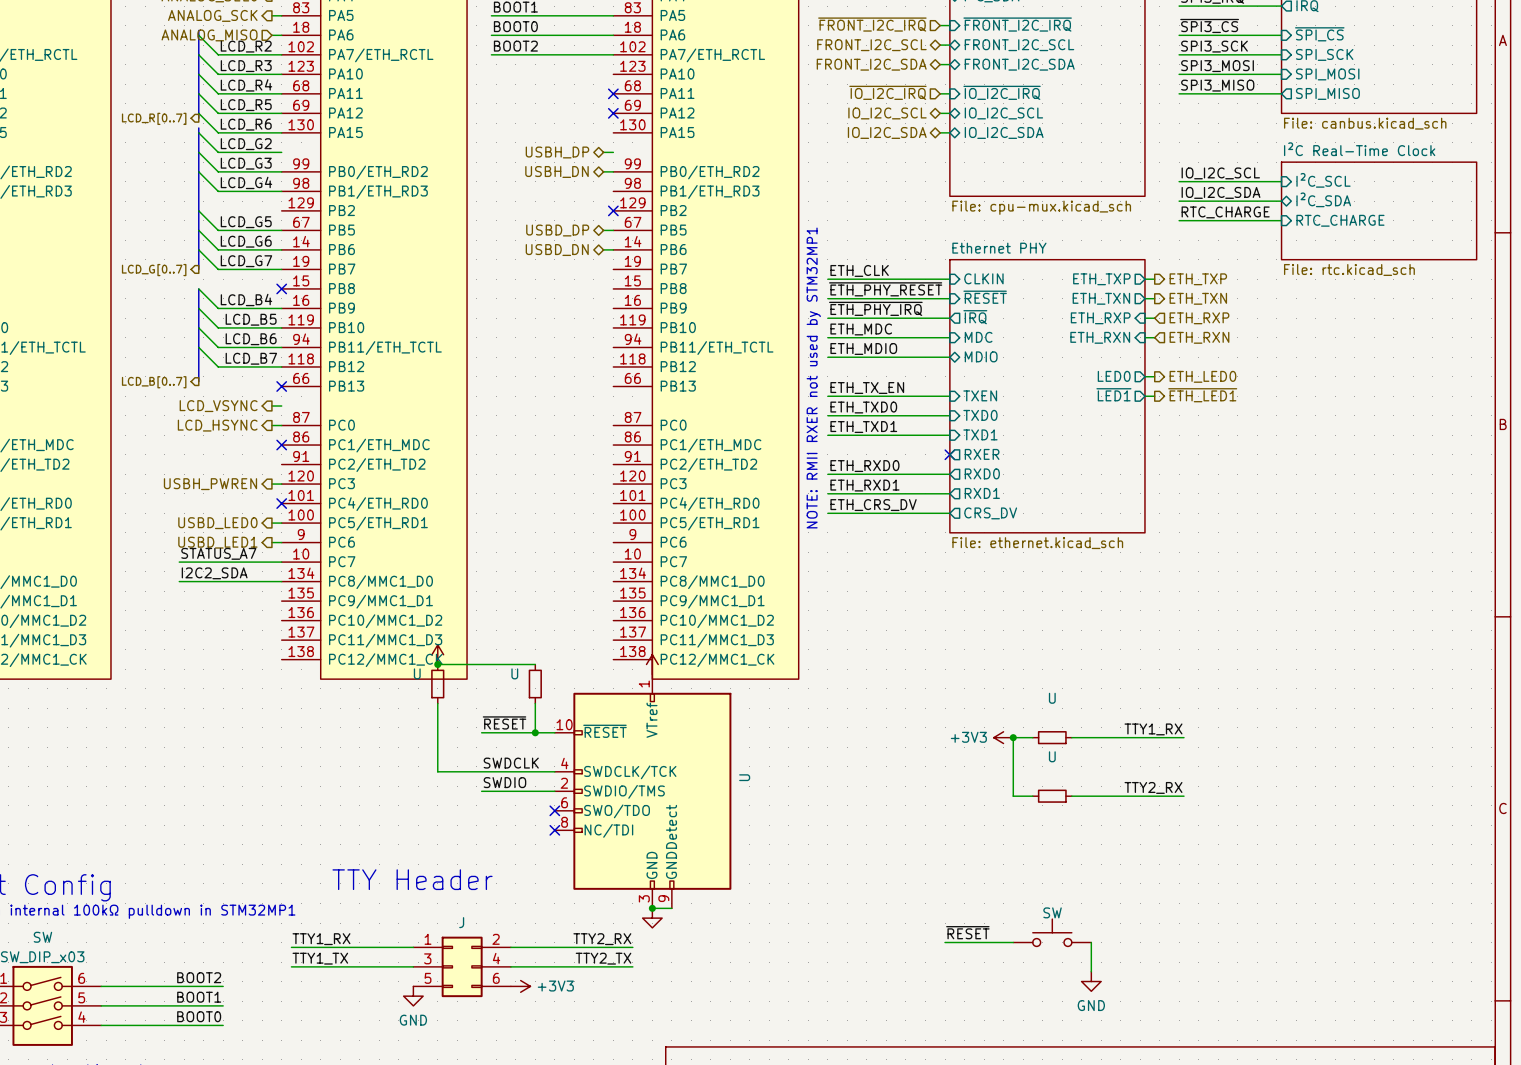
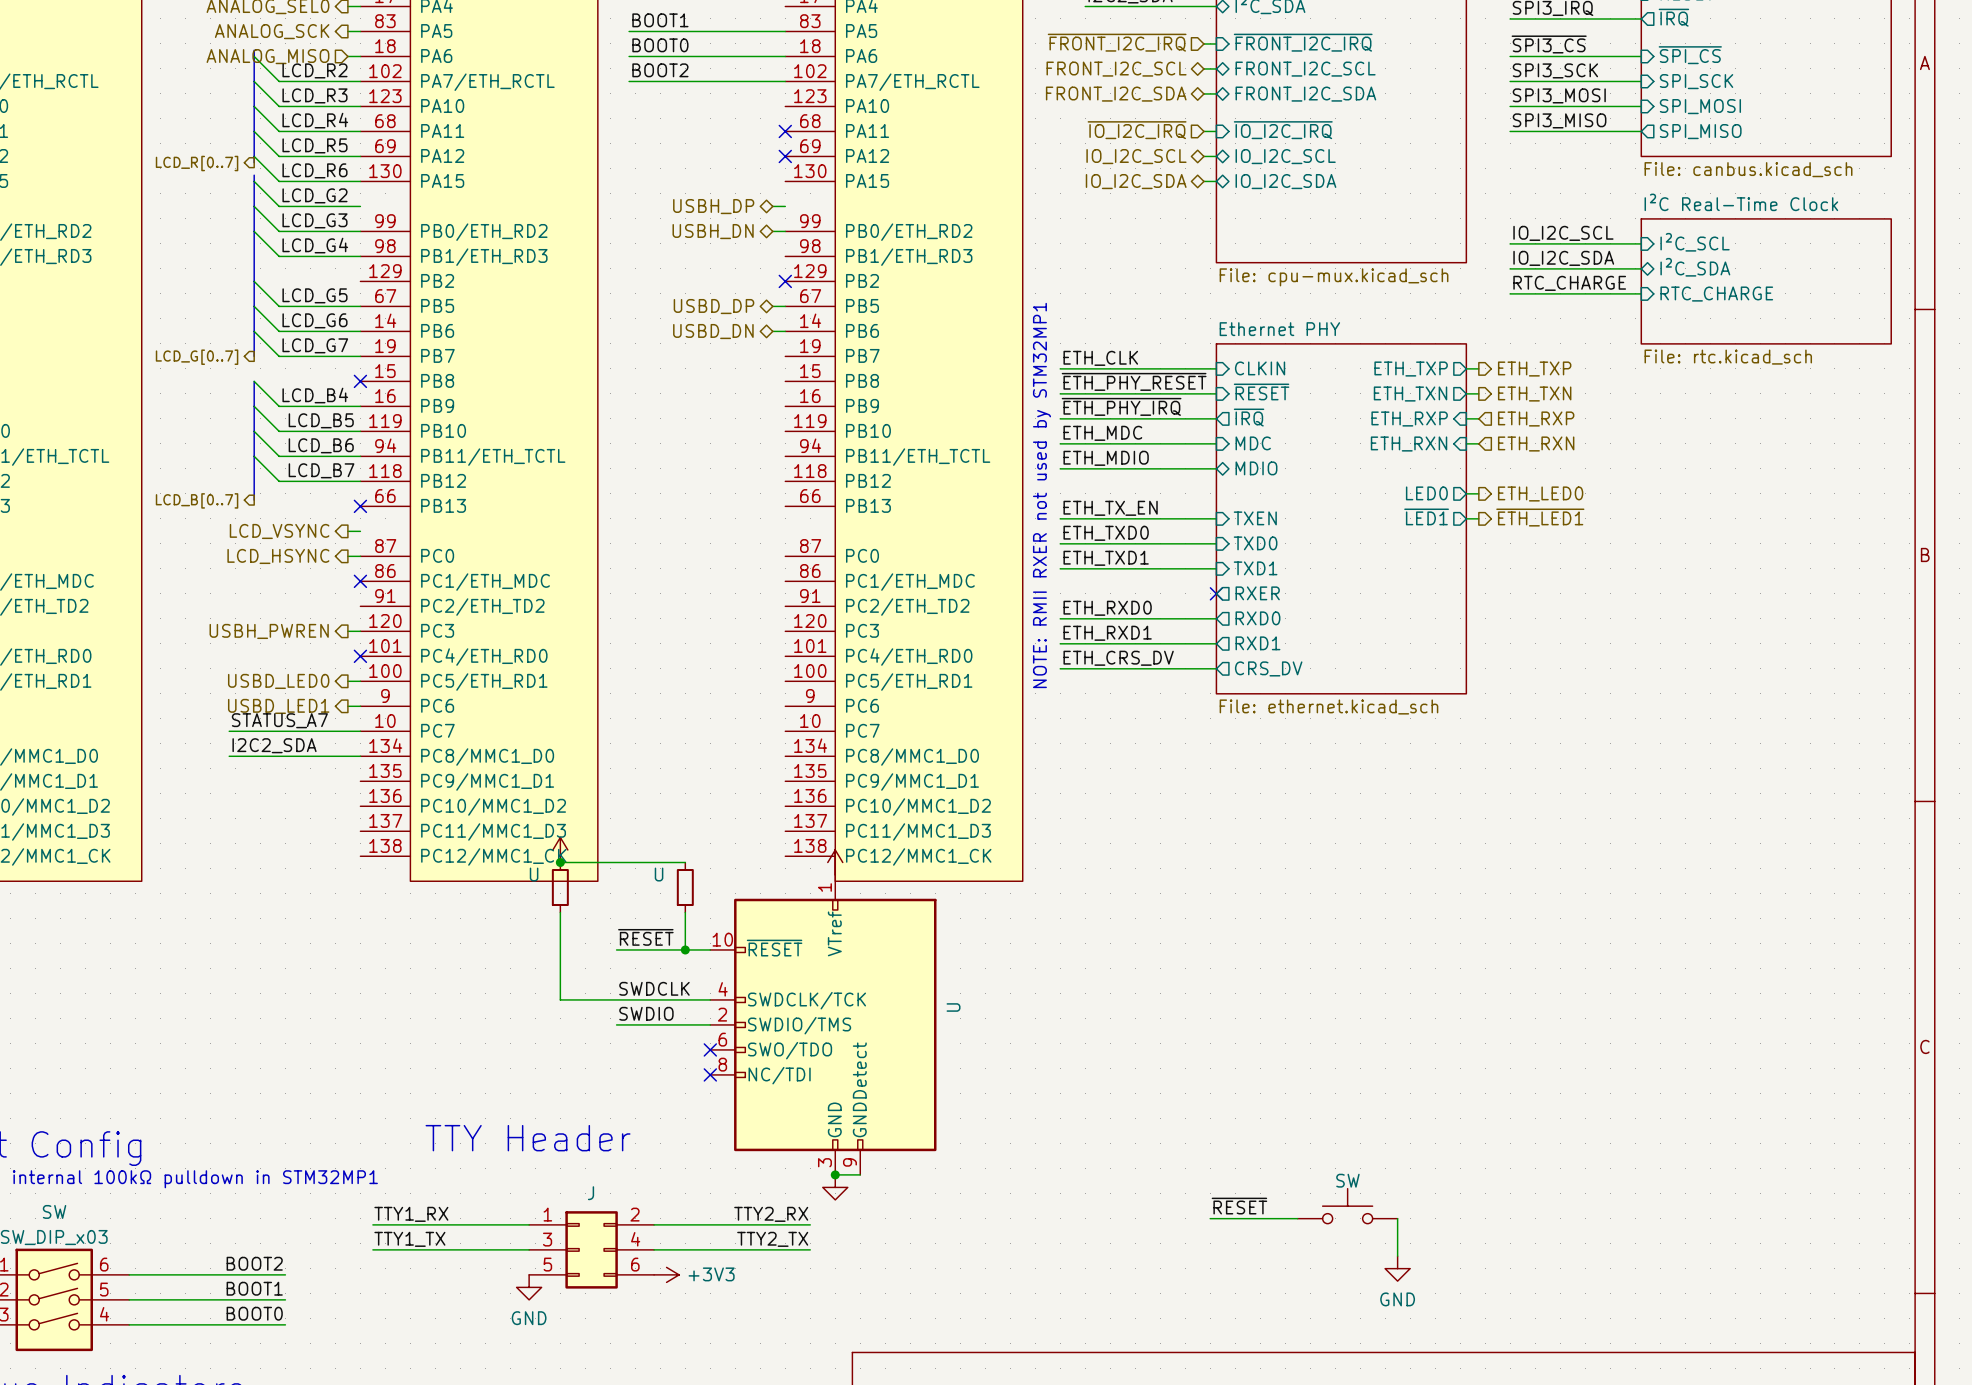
label: TTY1_RX (1153, 729) -> none
power symbol: +3V3 (1003, 737) -> none
junction: (1013, 737) -> none
wire: (1032, 737) (1013, 737) (1013, 796) (1032, 796) -> none
U: (1052, 737) -> none
wire: (1071, 737) (1183, 737) -> none
label: TTY2_RX (1153, 787) -> none
U: (1052, 796) -> none
wire: (1071, 796) (1183, 796) -> none

